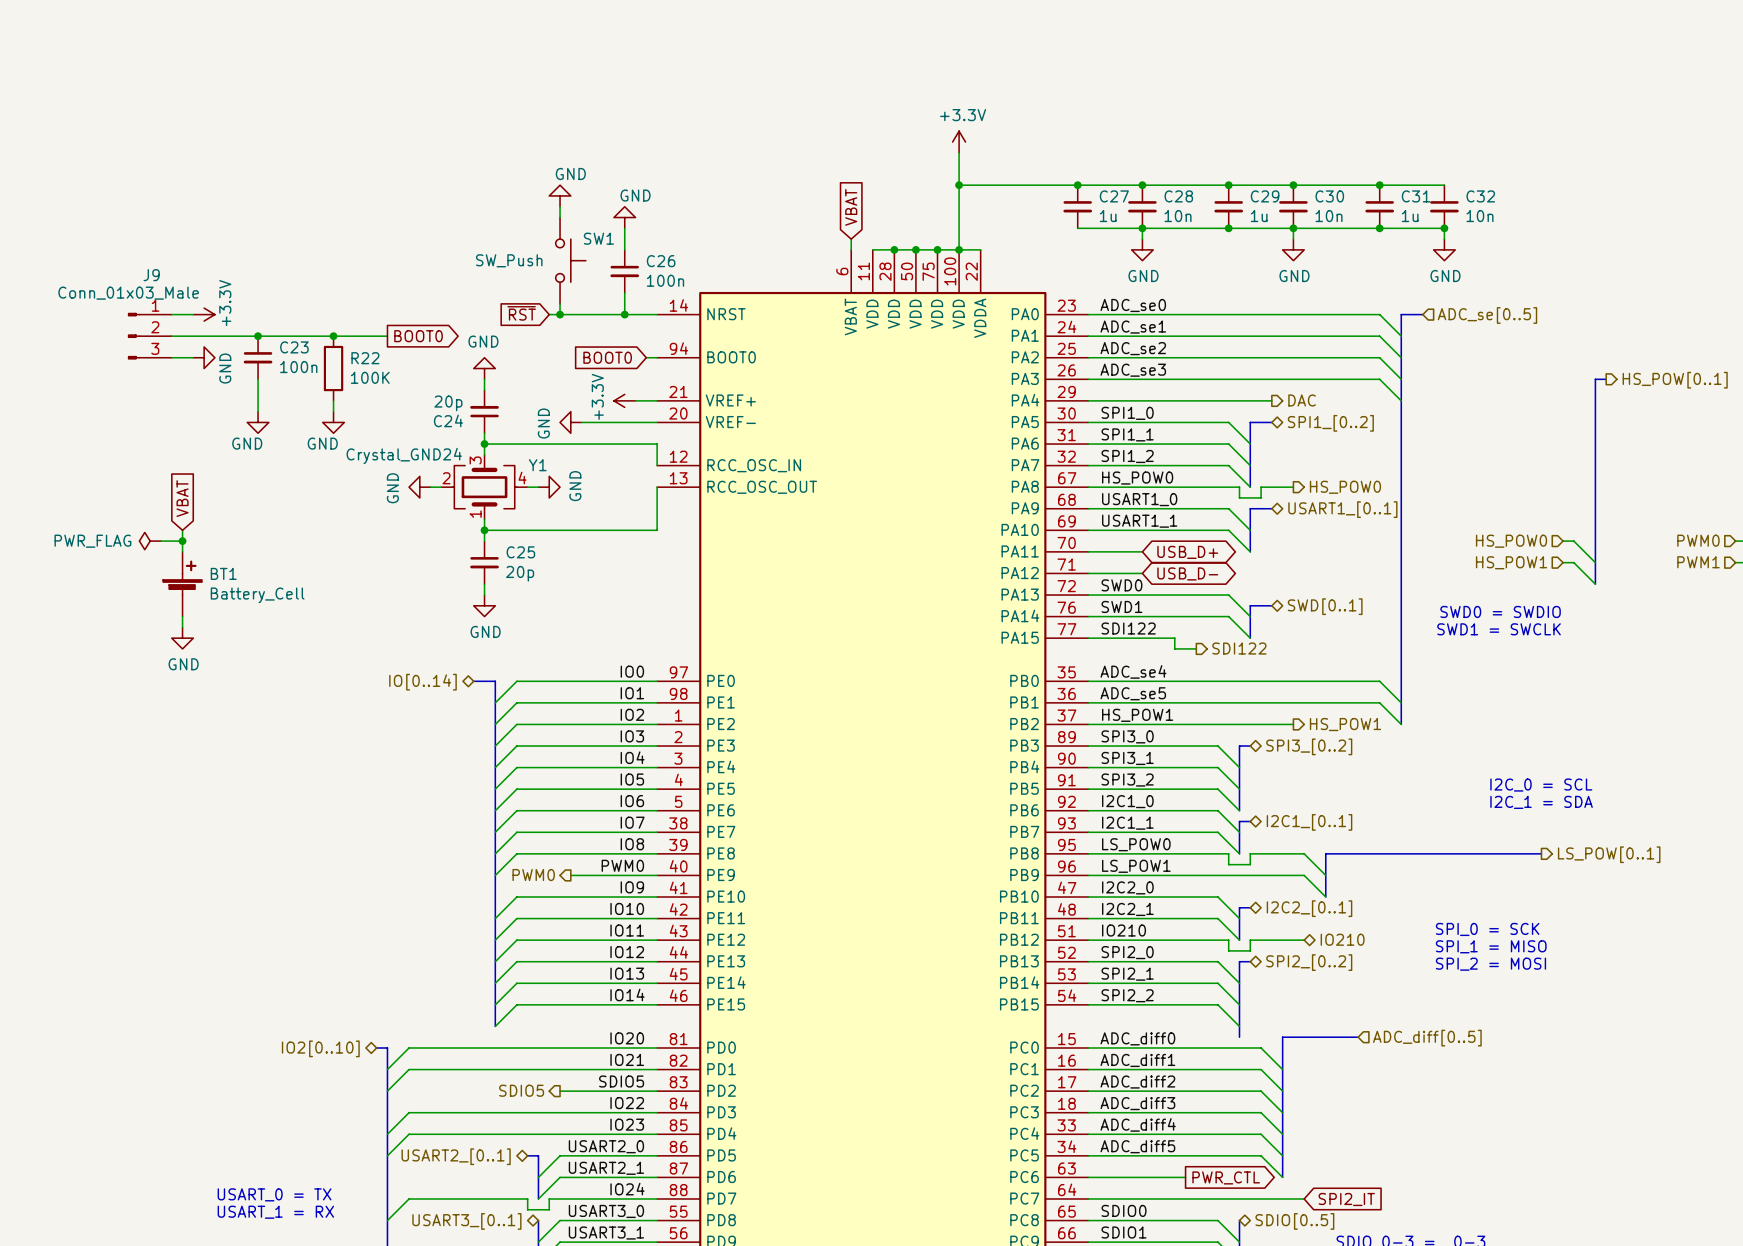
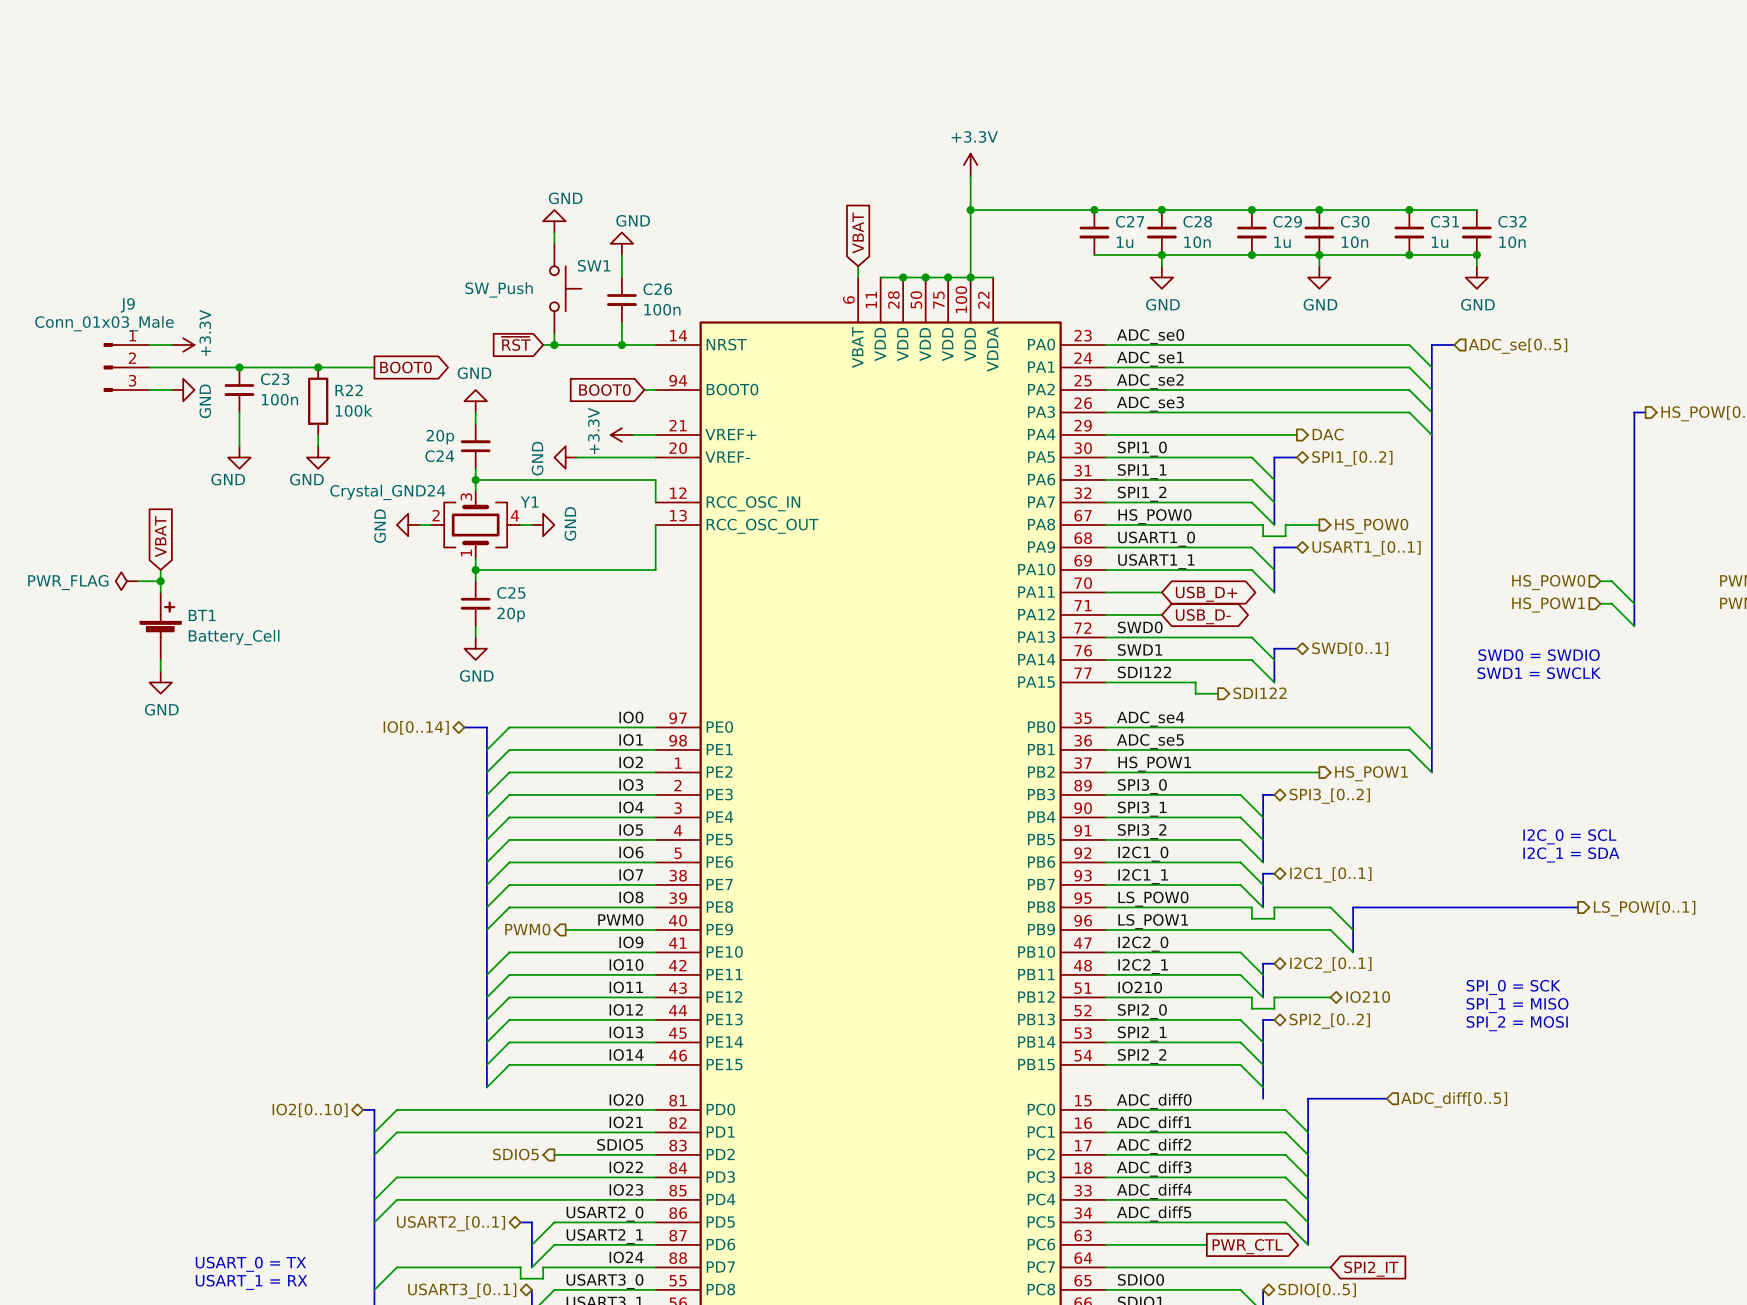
R22 value: 100K (370, 377) -> 100k (353, 410)

